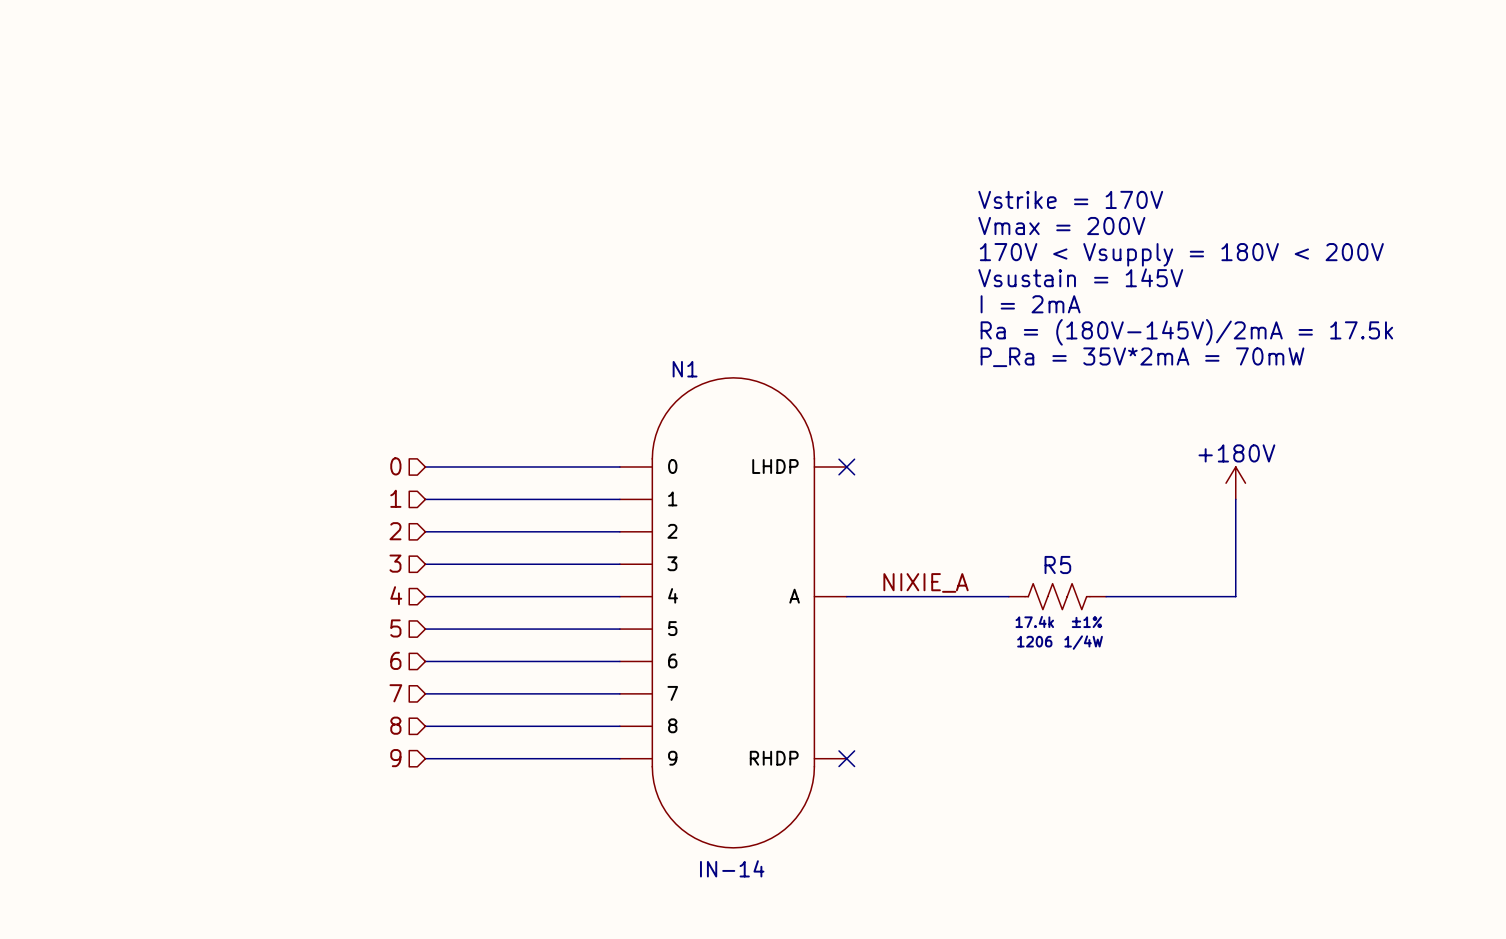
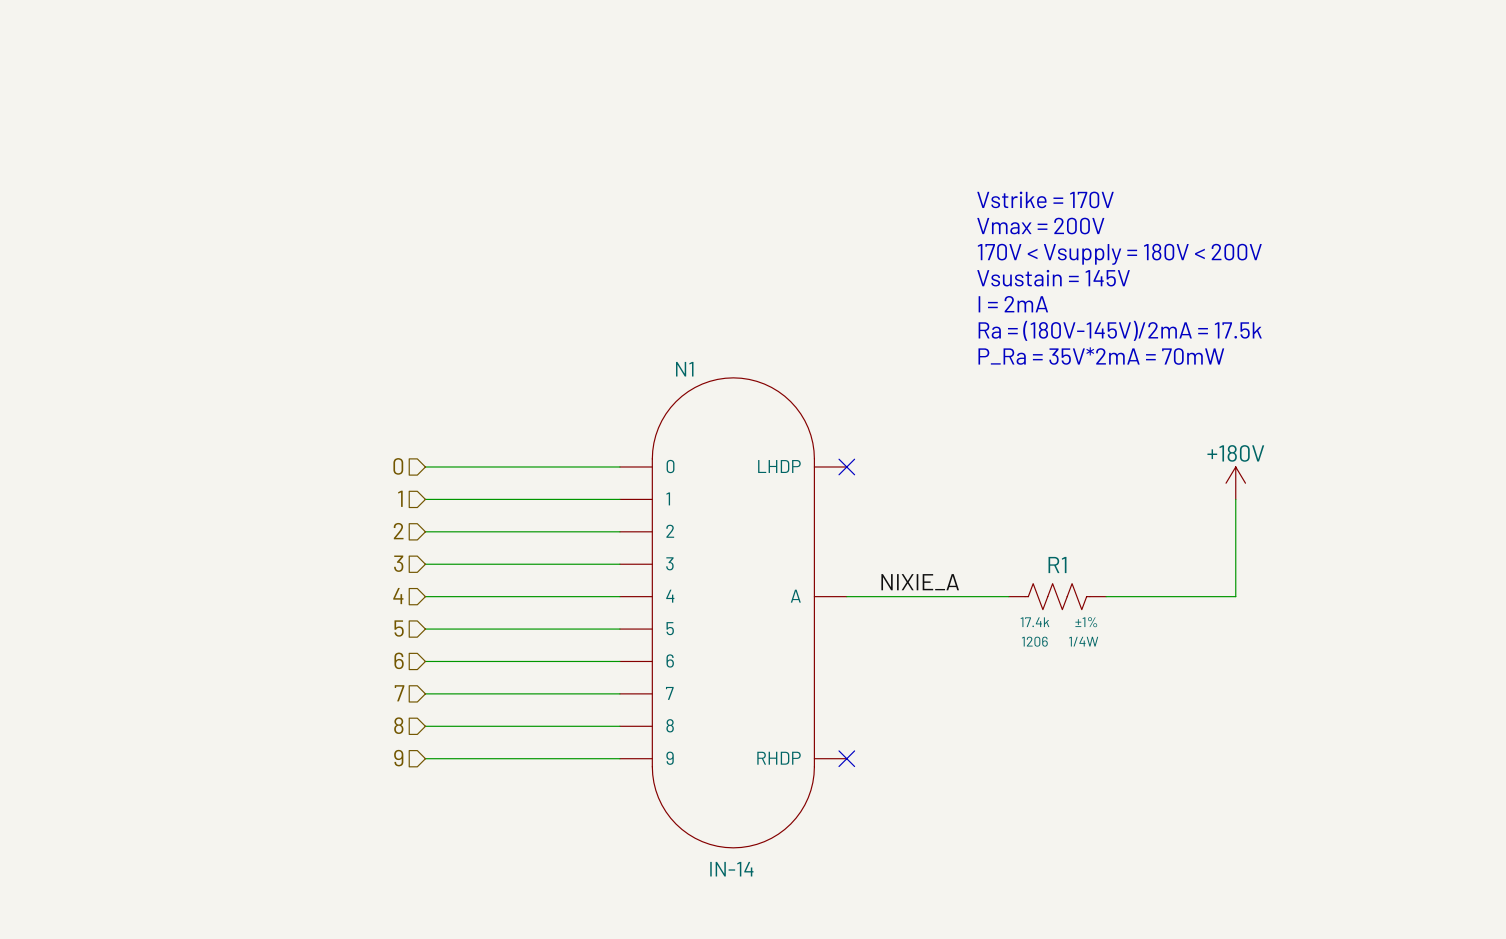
R5 name: R5 (1057, 565) -> R1 (1057, 565)

